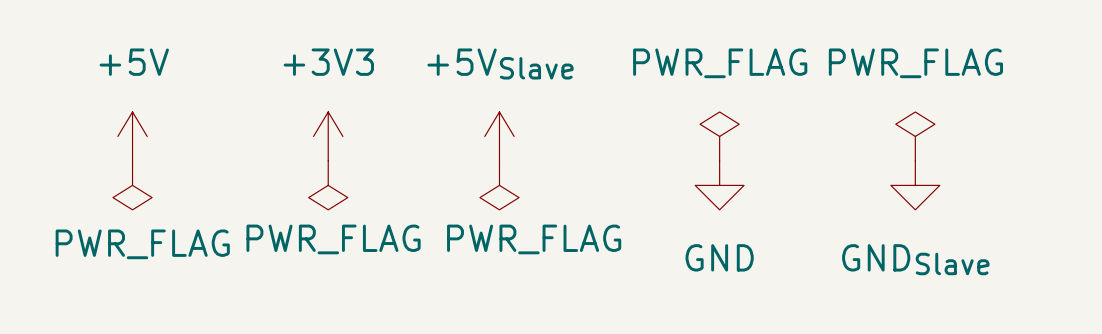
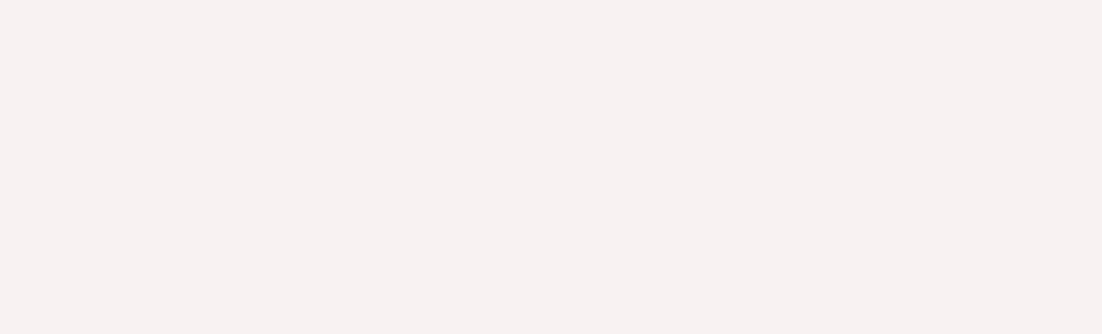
power symbol: +5V (132, 136) -> none
power symbol: +3V3 (328, 136) -> none
power symbol: +5VSlave (499, 136) -> none
power symbol: PWR_FLAG (719, 136) -> none
power symbol: PWR_FLAG (915, 136) -> none
power symbol: PWR_FLAG (132, 185) -> none
power symbol: PWR_FLAG (328, 185) -> none
power symbol: PWR_FLAG (499, 185) -> none
power symbol: GND (719, 185) -> none
power symbol: GNDSlave (915, 185) -> none

